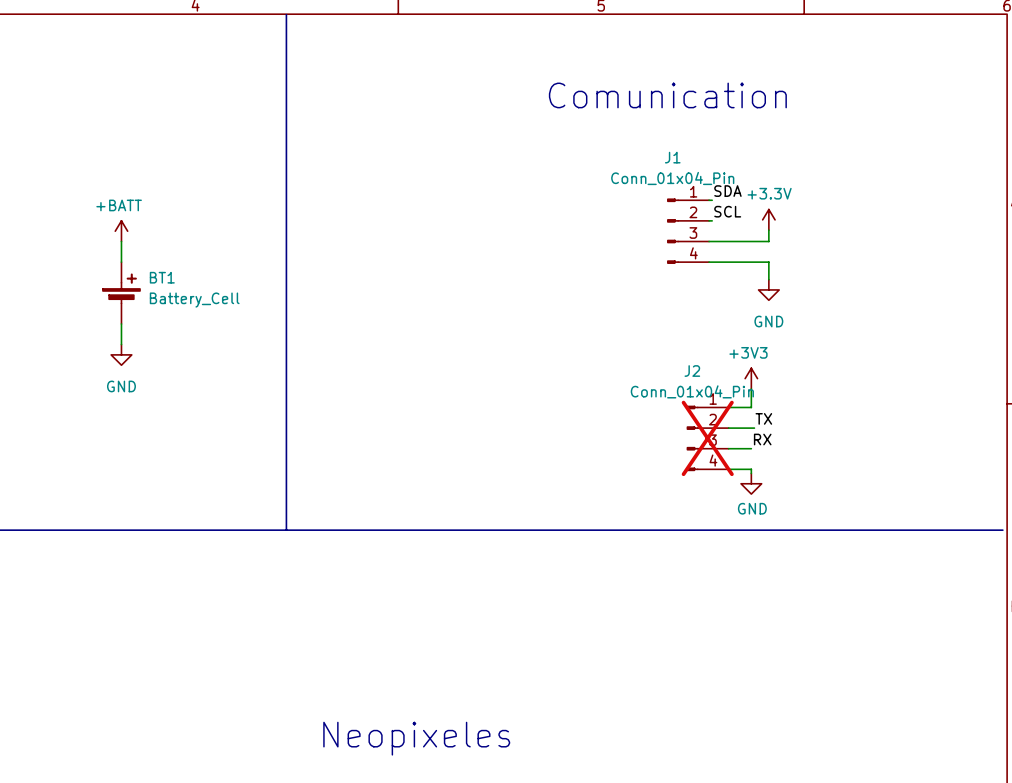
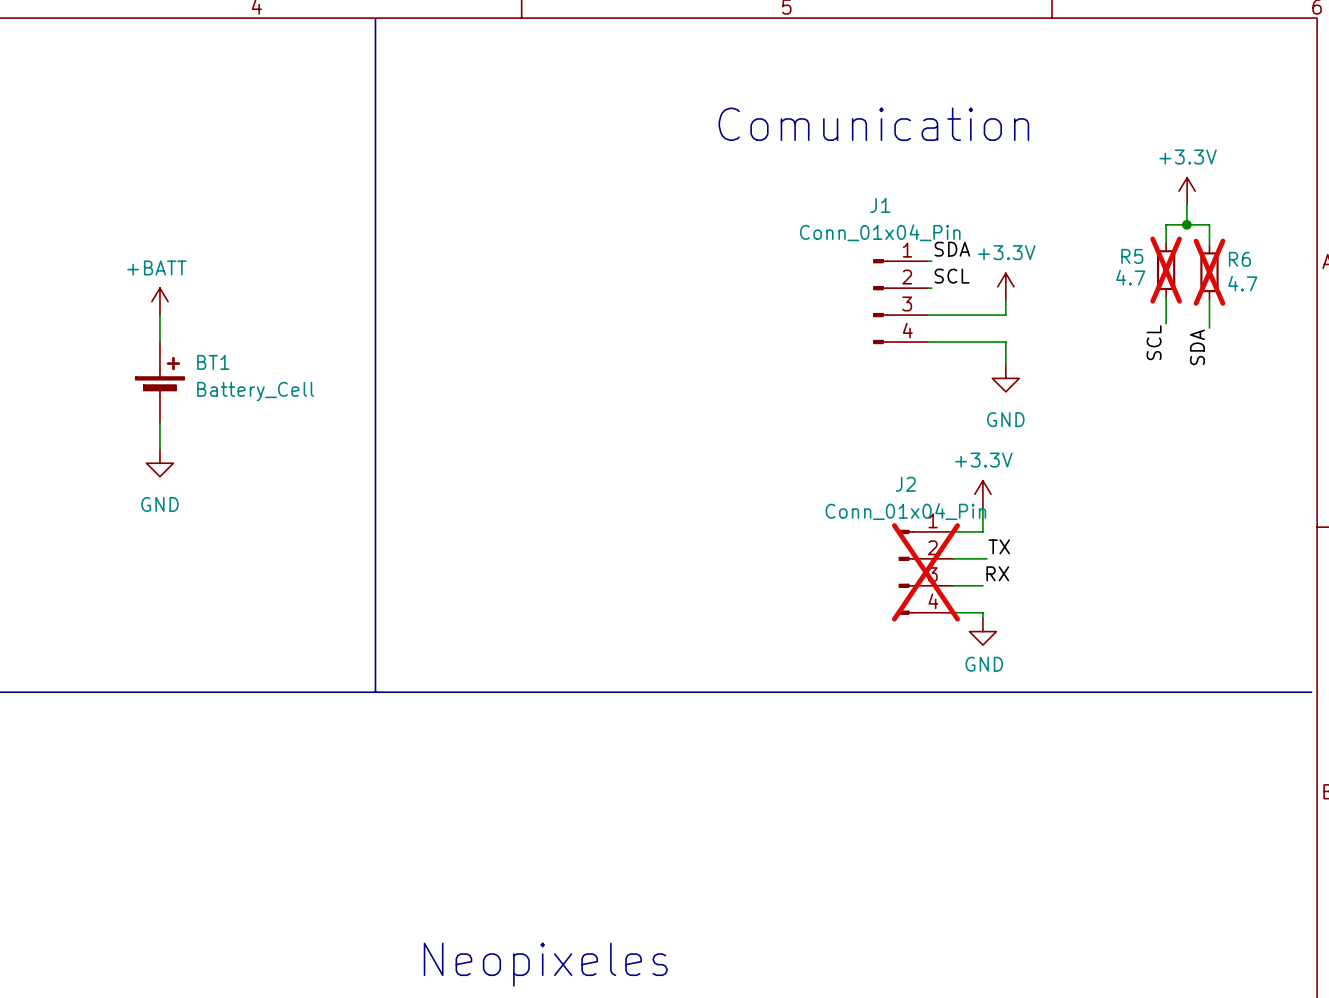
power symbol: none -> +3.3V (1187, 191)
wire: none -> (1187, 204) (1186, 224)
junction: none -> (1186, 224)
wire: none -> (1166, 243) (1166, 224) (1209, 224) (1209, 245)
R5: none -> 4.7 (1166, 270)
R6: none -> 4.7 (1209, 272)
wire: none -> (1166, 297) (1166, 323)
wire: none -> (1209, 299) (1209, 328)
label: none -> SCL (1154, 342)
label: none -> SDA (1197, 347)
power symbol: +3V3 (751, 378) -> +3.3V (982, 494)

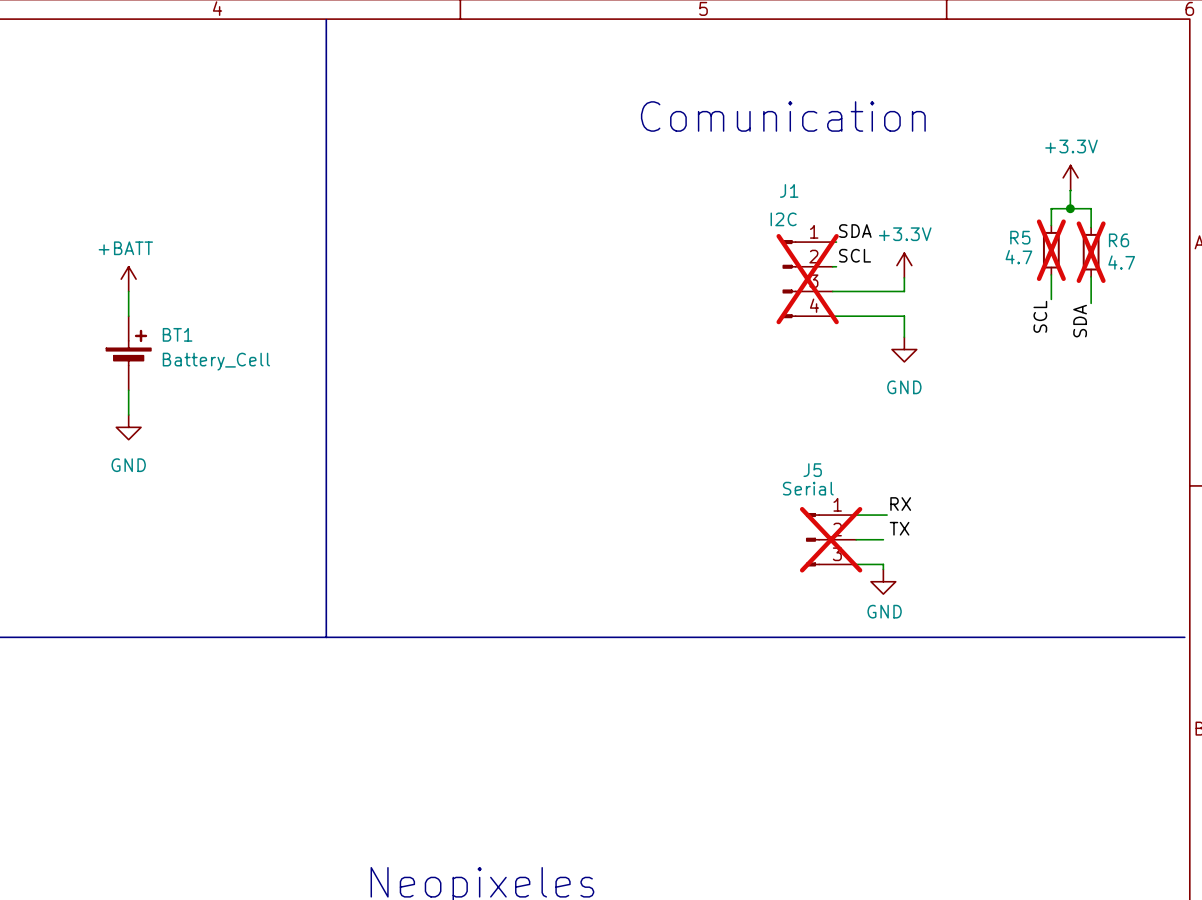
J1 value: Conn_01x04_Pin (880, 232) -> I2C (783, 219)
J1 do-not-place cross: none -> (807, 279)
power symbol: +3.3V (982, 494) -> none
wire: (982, 507) (982, 531) (953, 531) -> none
label: TX (999, 546) -> RX (900, 504)
J2: Conn_01x04_Pin (925, 572) -> none
label: RX (997, 573) -> TX (899, 528)
J5: none -> Serial (831, 539)

